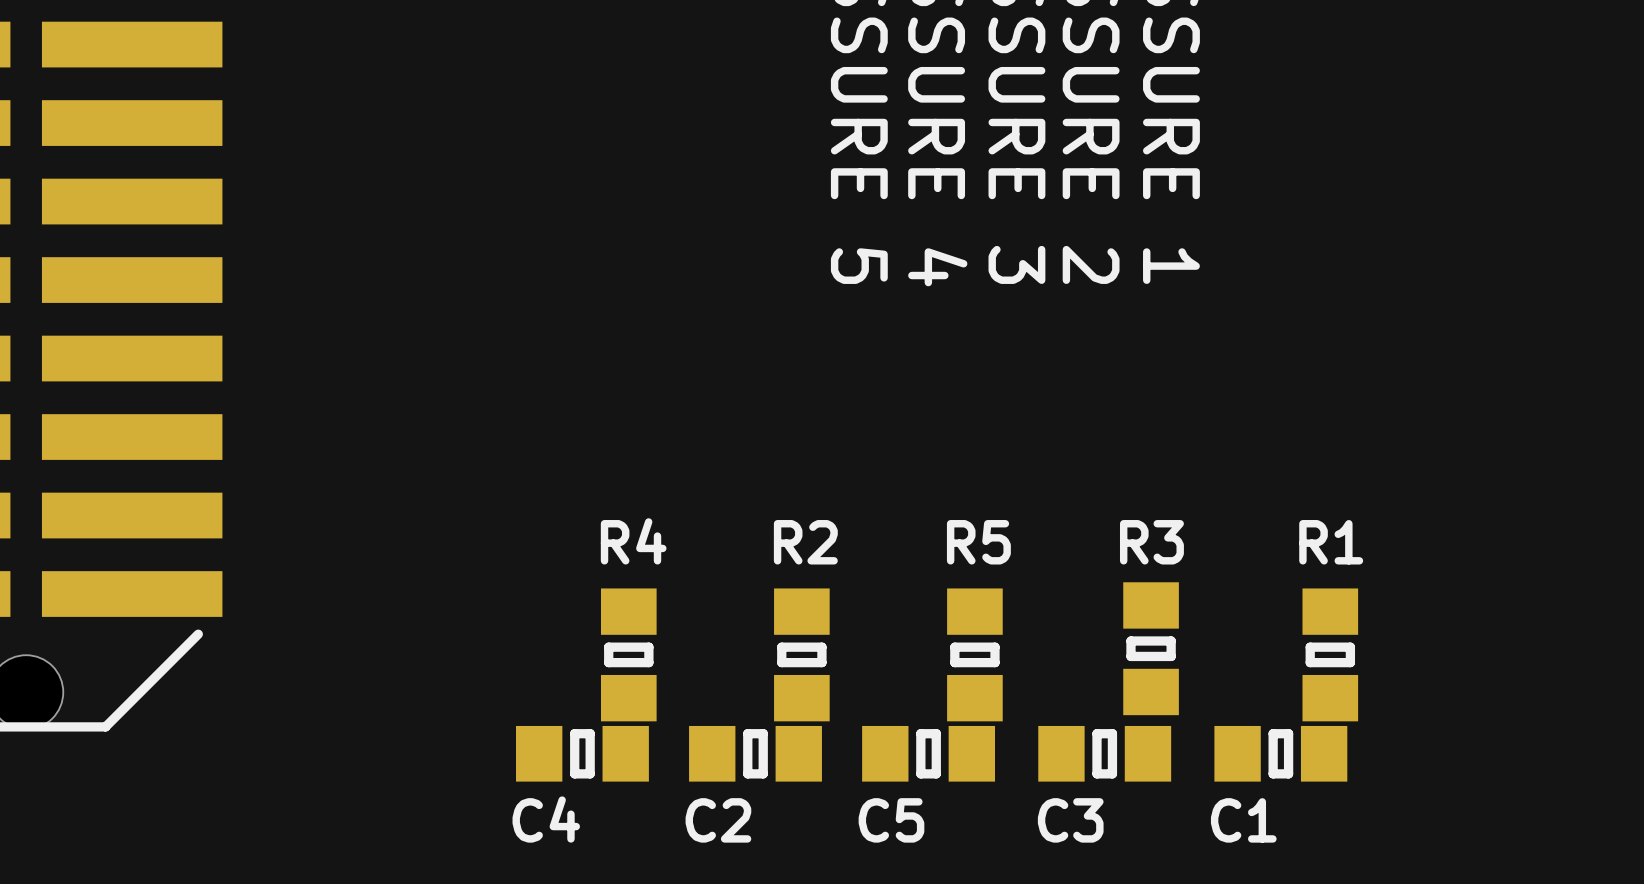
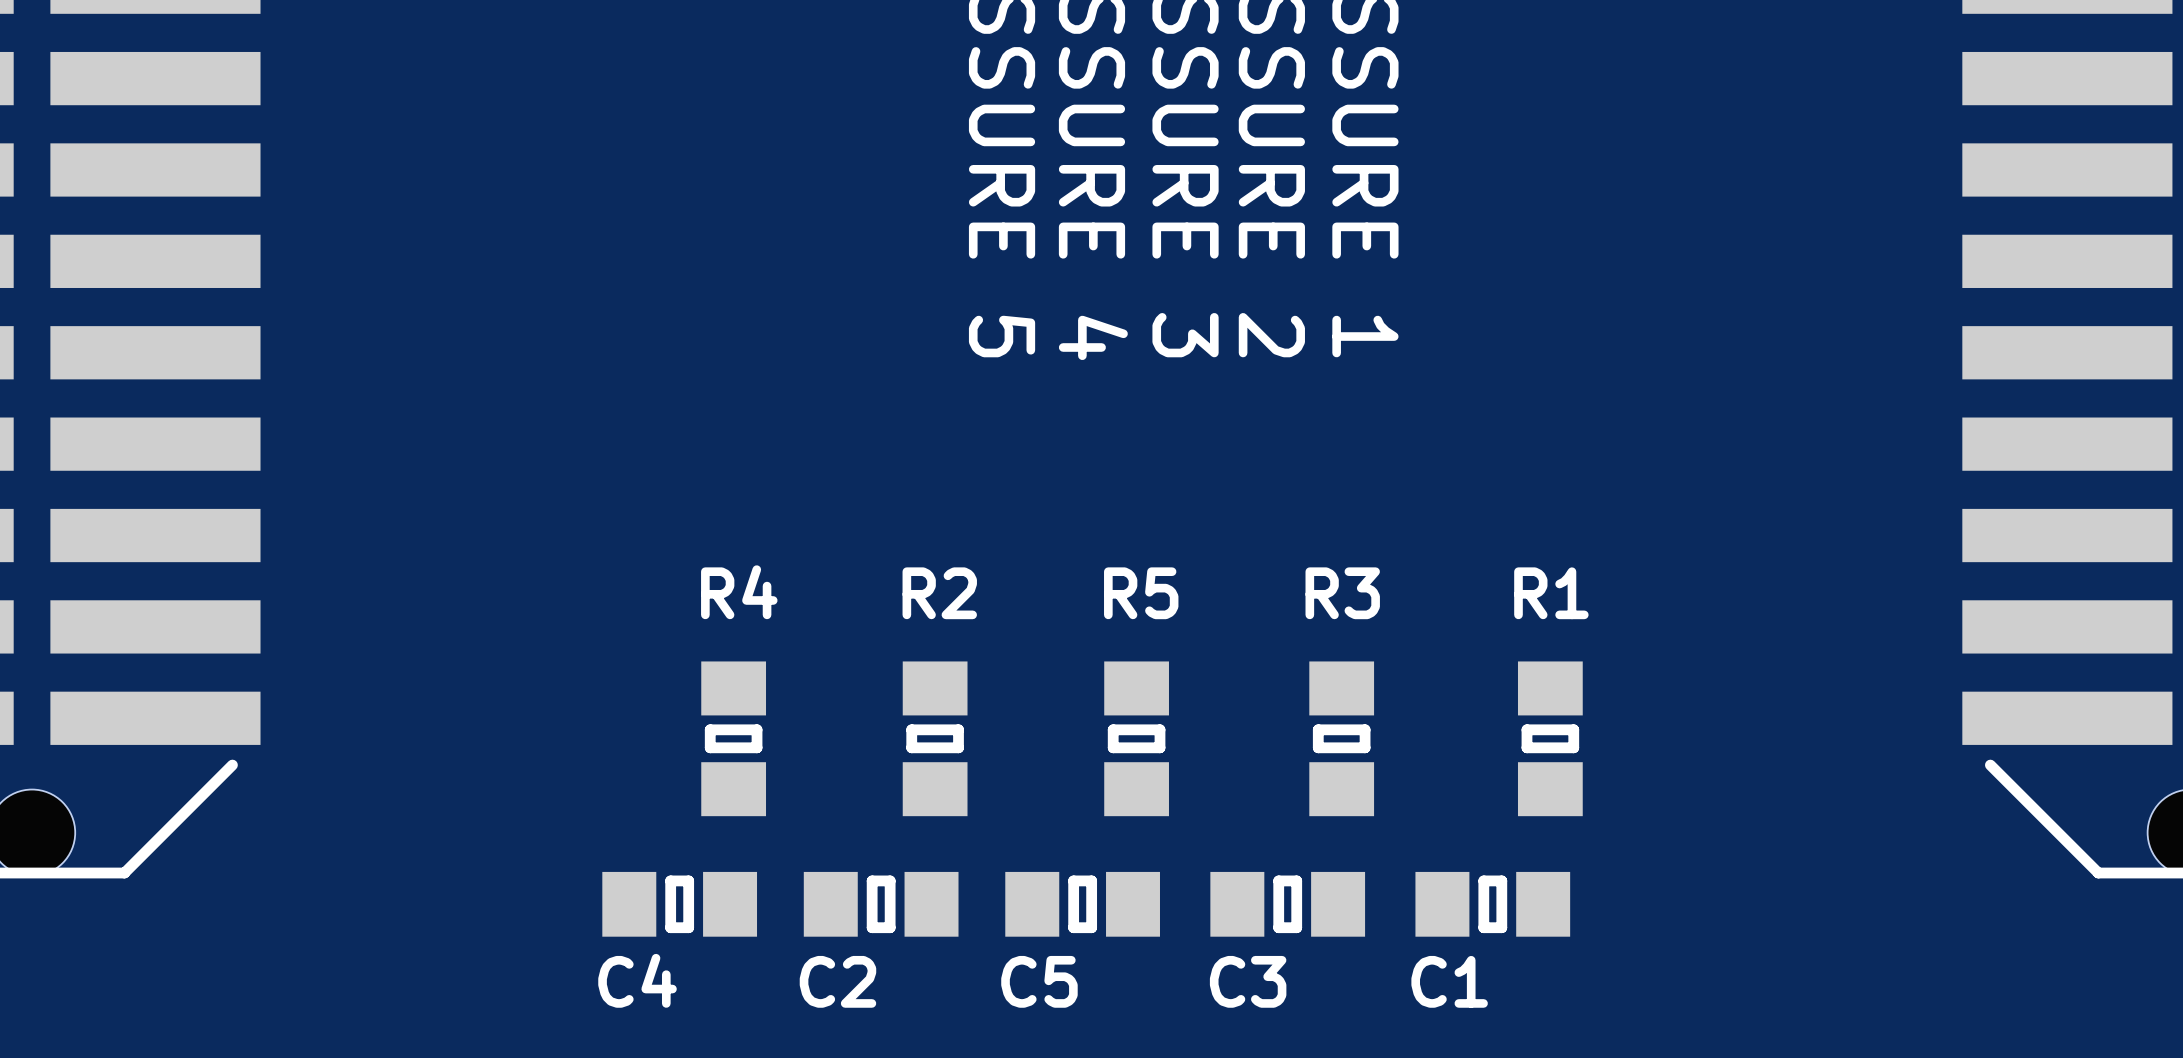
text position: R4 (633, 541) -> R4 (739, 592)
text position: R2 (805, 542) -> R2 (939, 593)
text position: R5 (978, 542) -> R5 (1141, 593)
text position: R3 (1151, 542) -> R3 (1342, 593)
text position: R1 (1331, 542) -> R1 (1551, 593)
part position: (1151, 648) -> (1341, 738)
part position: (628, 654) -> (733, 738)
part position: (801, 654) -> (935, 738)
part position: (974, 654) -> (1136, 738)
part position: (1330, 654) -> (1550, 738)

